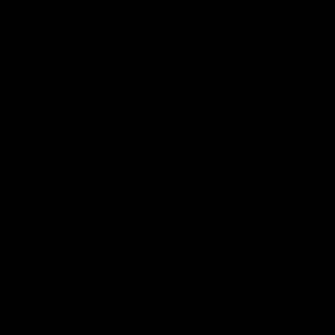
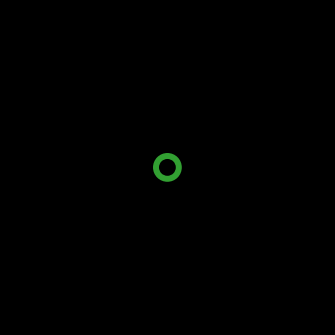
via: none -> (167, 167)

